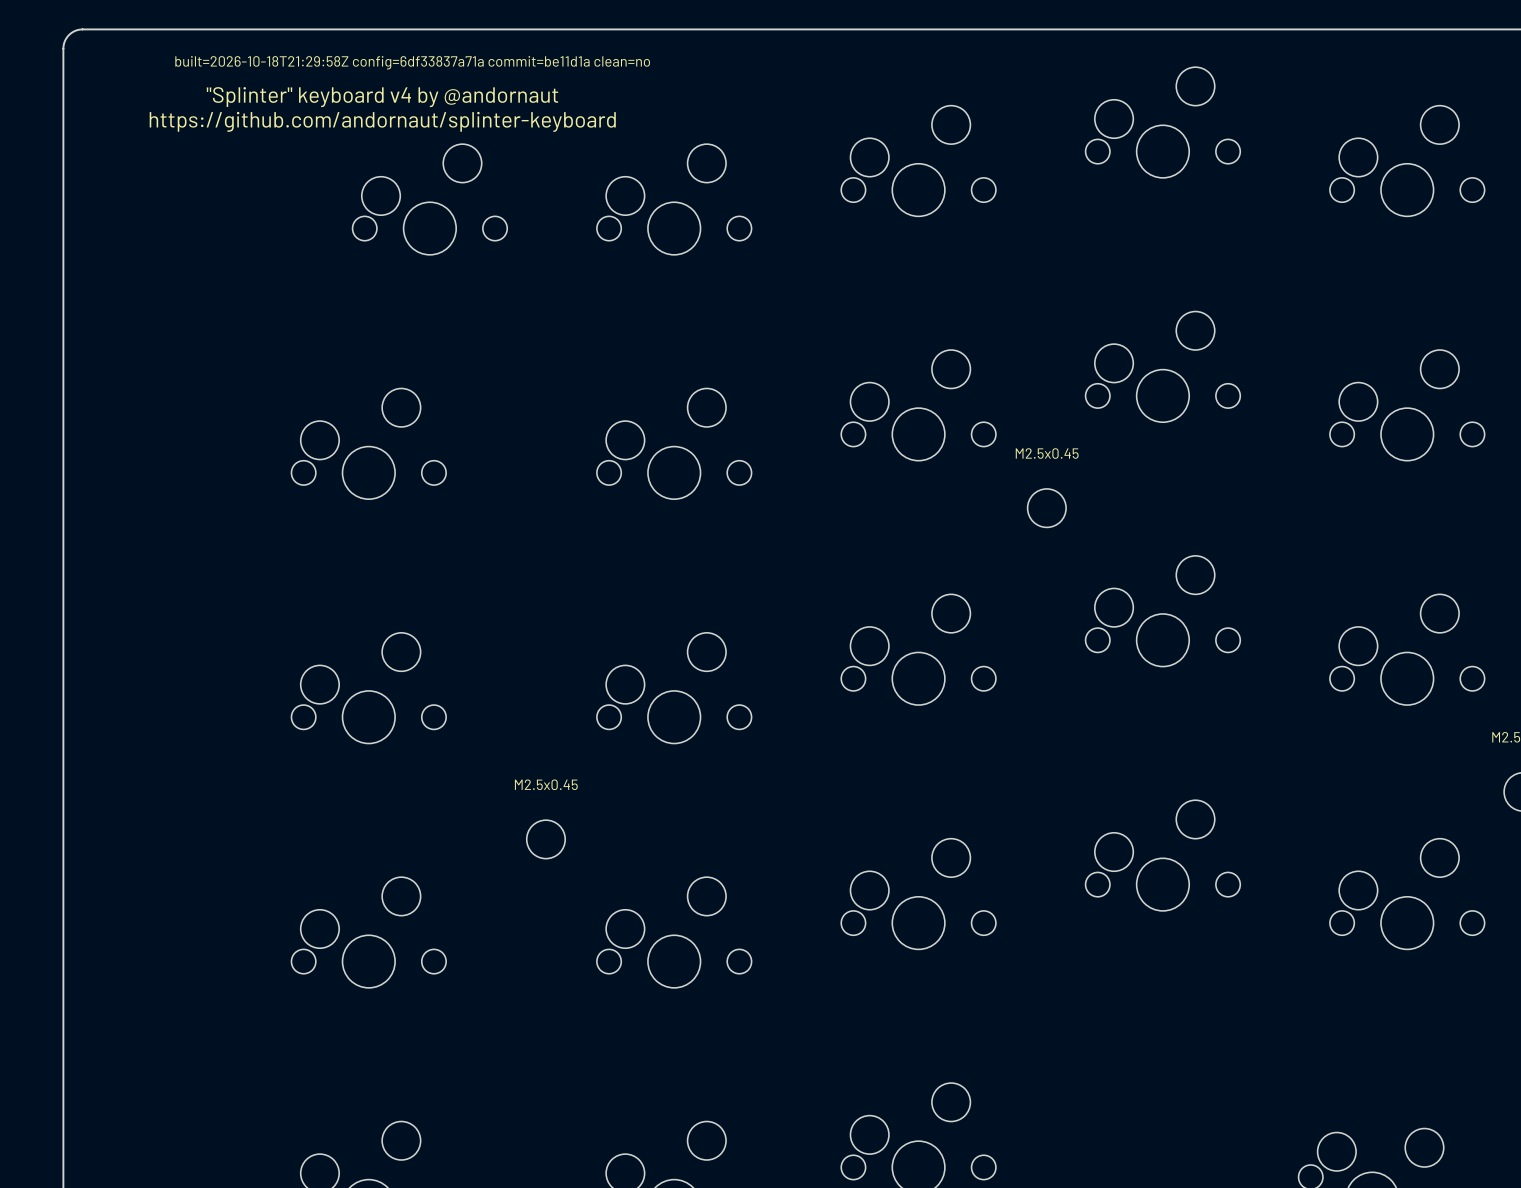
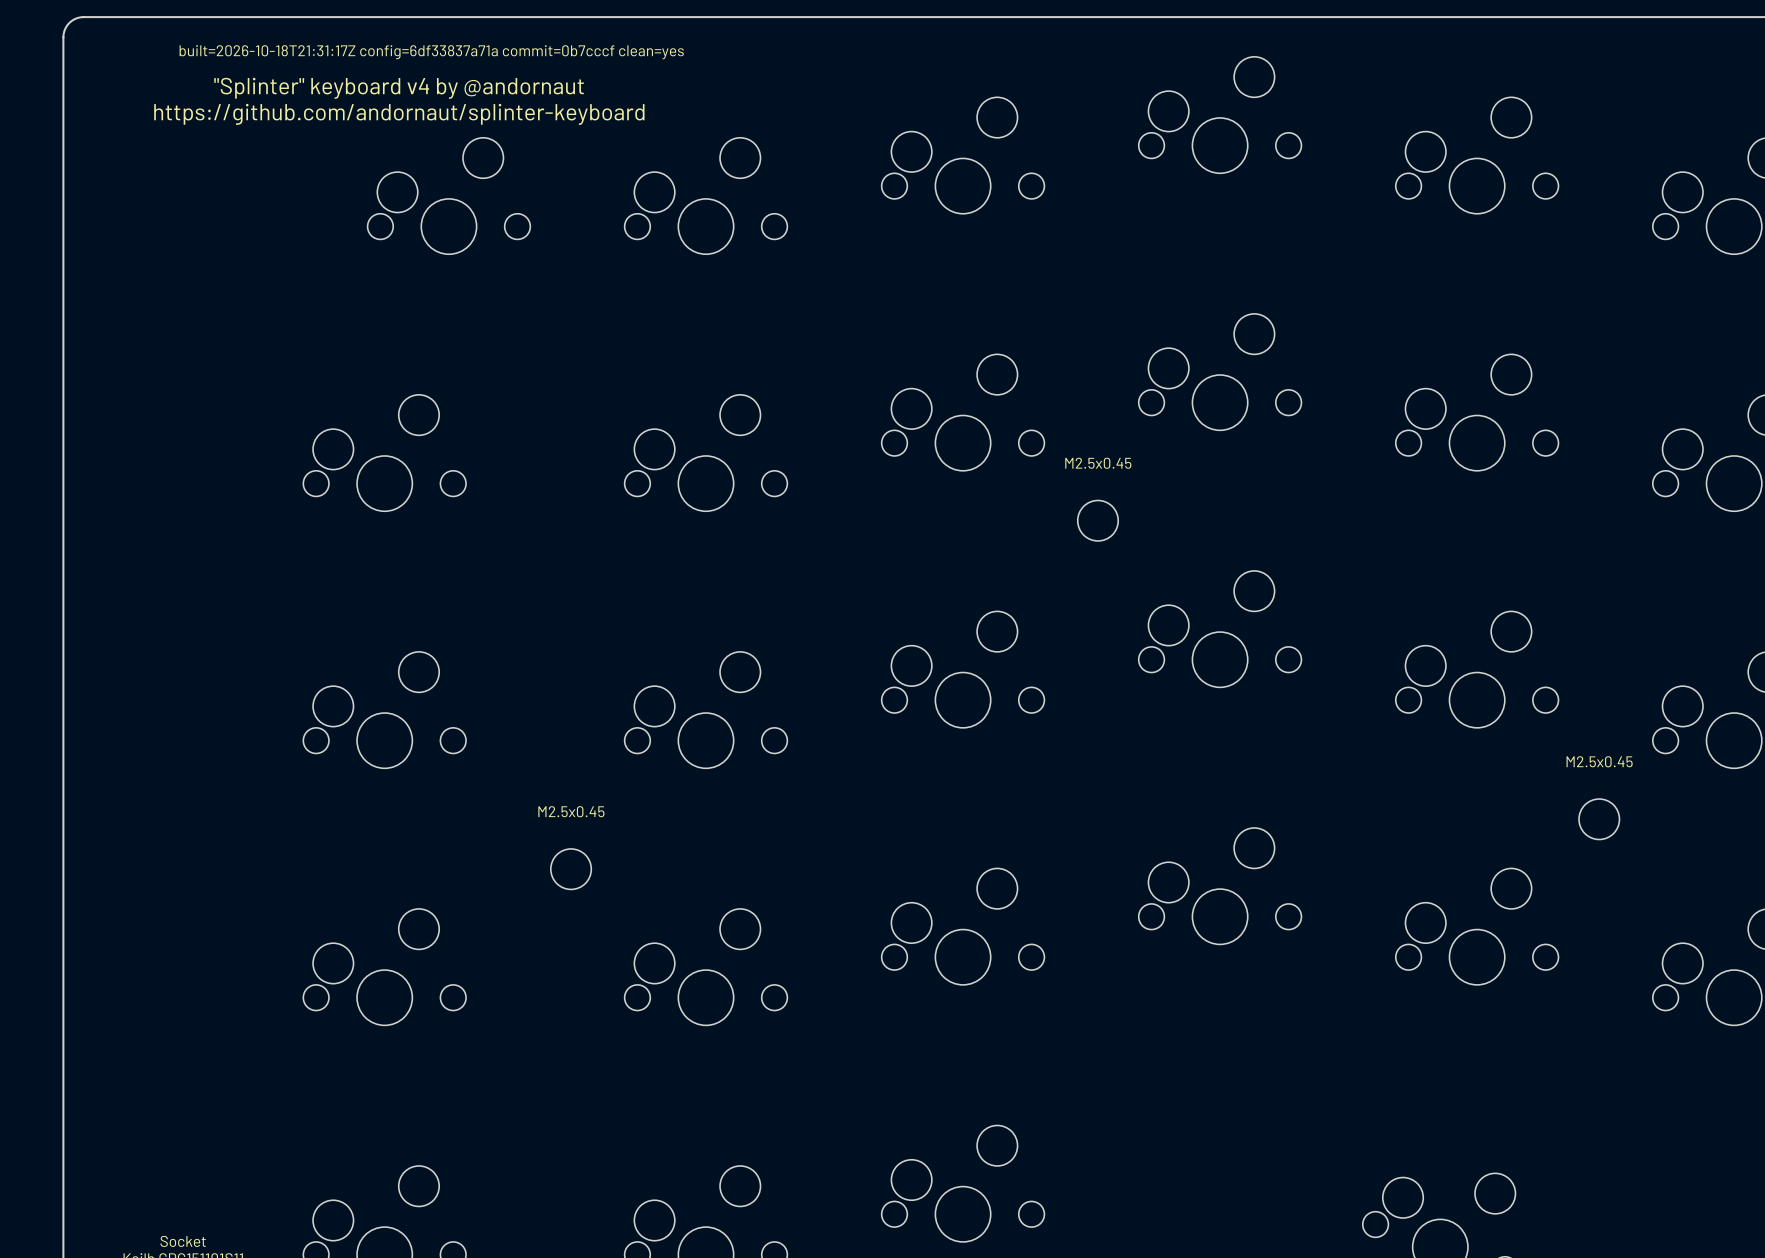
text: built=2026-10-18T21:29:58Z config=6df33837a71a commit=be11d1a clean=no (412, 62) -> built=2026-10-18T21:31:17Z config=6df33837a71a commit=0b7cccf clean=yes (431, 52)

